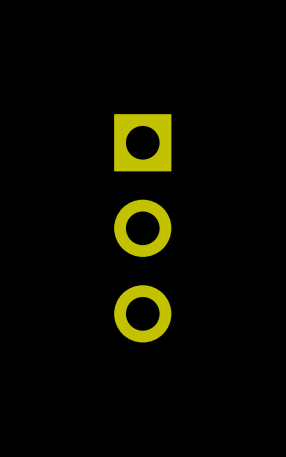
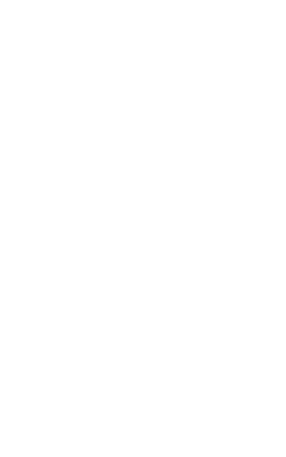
part: (142, 228) -> none

